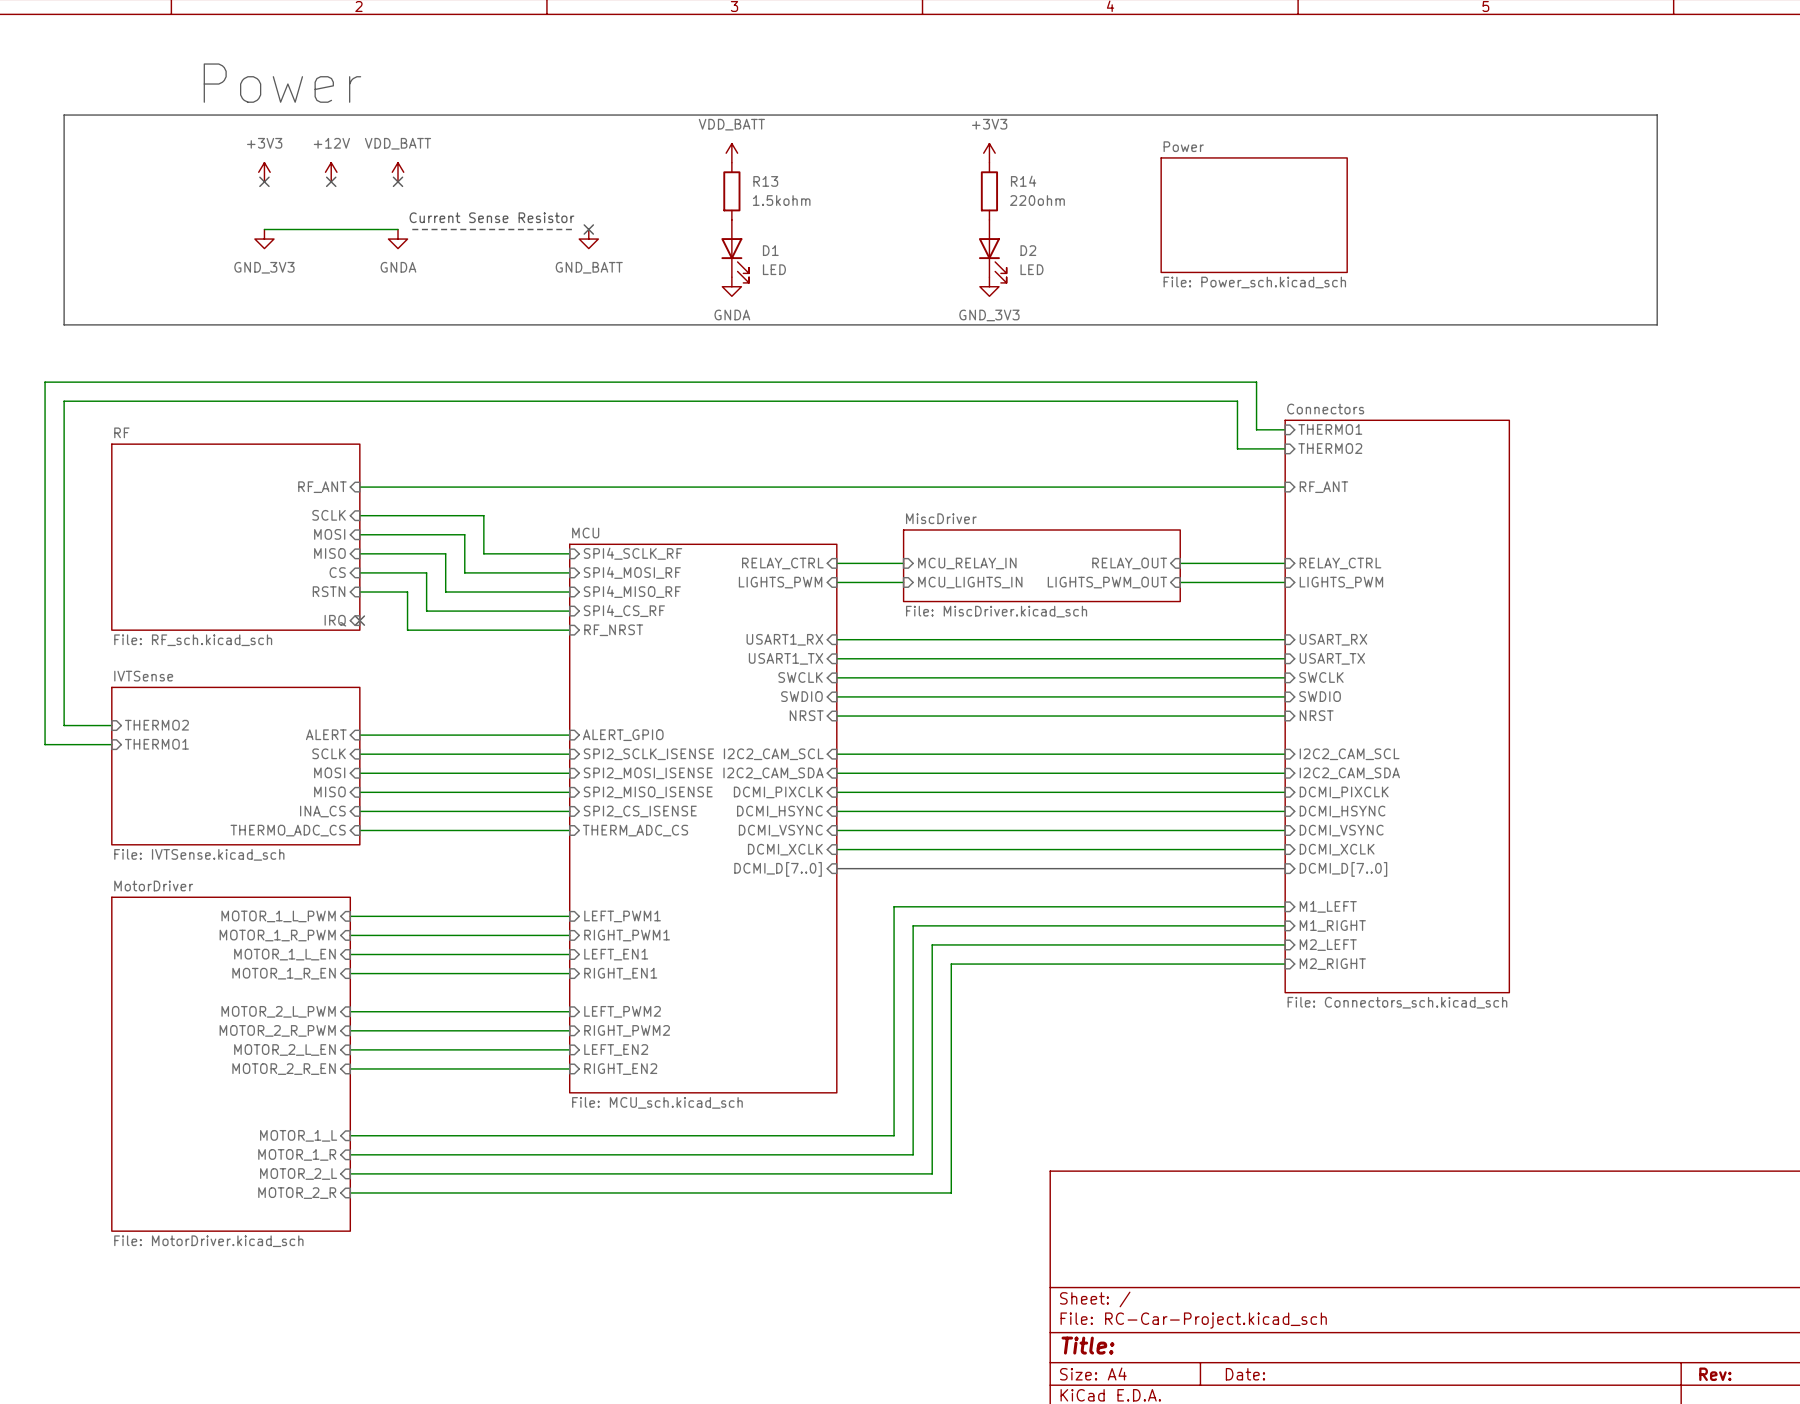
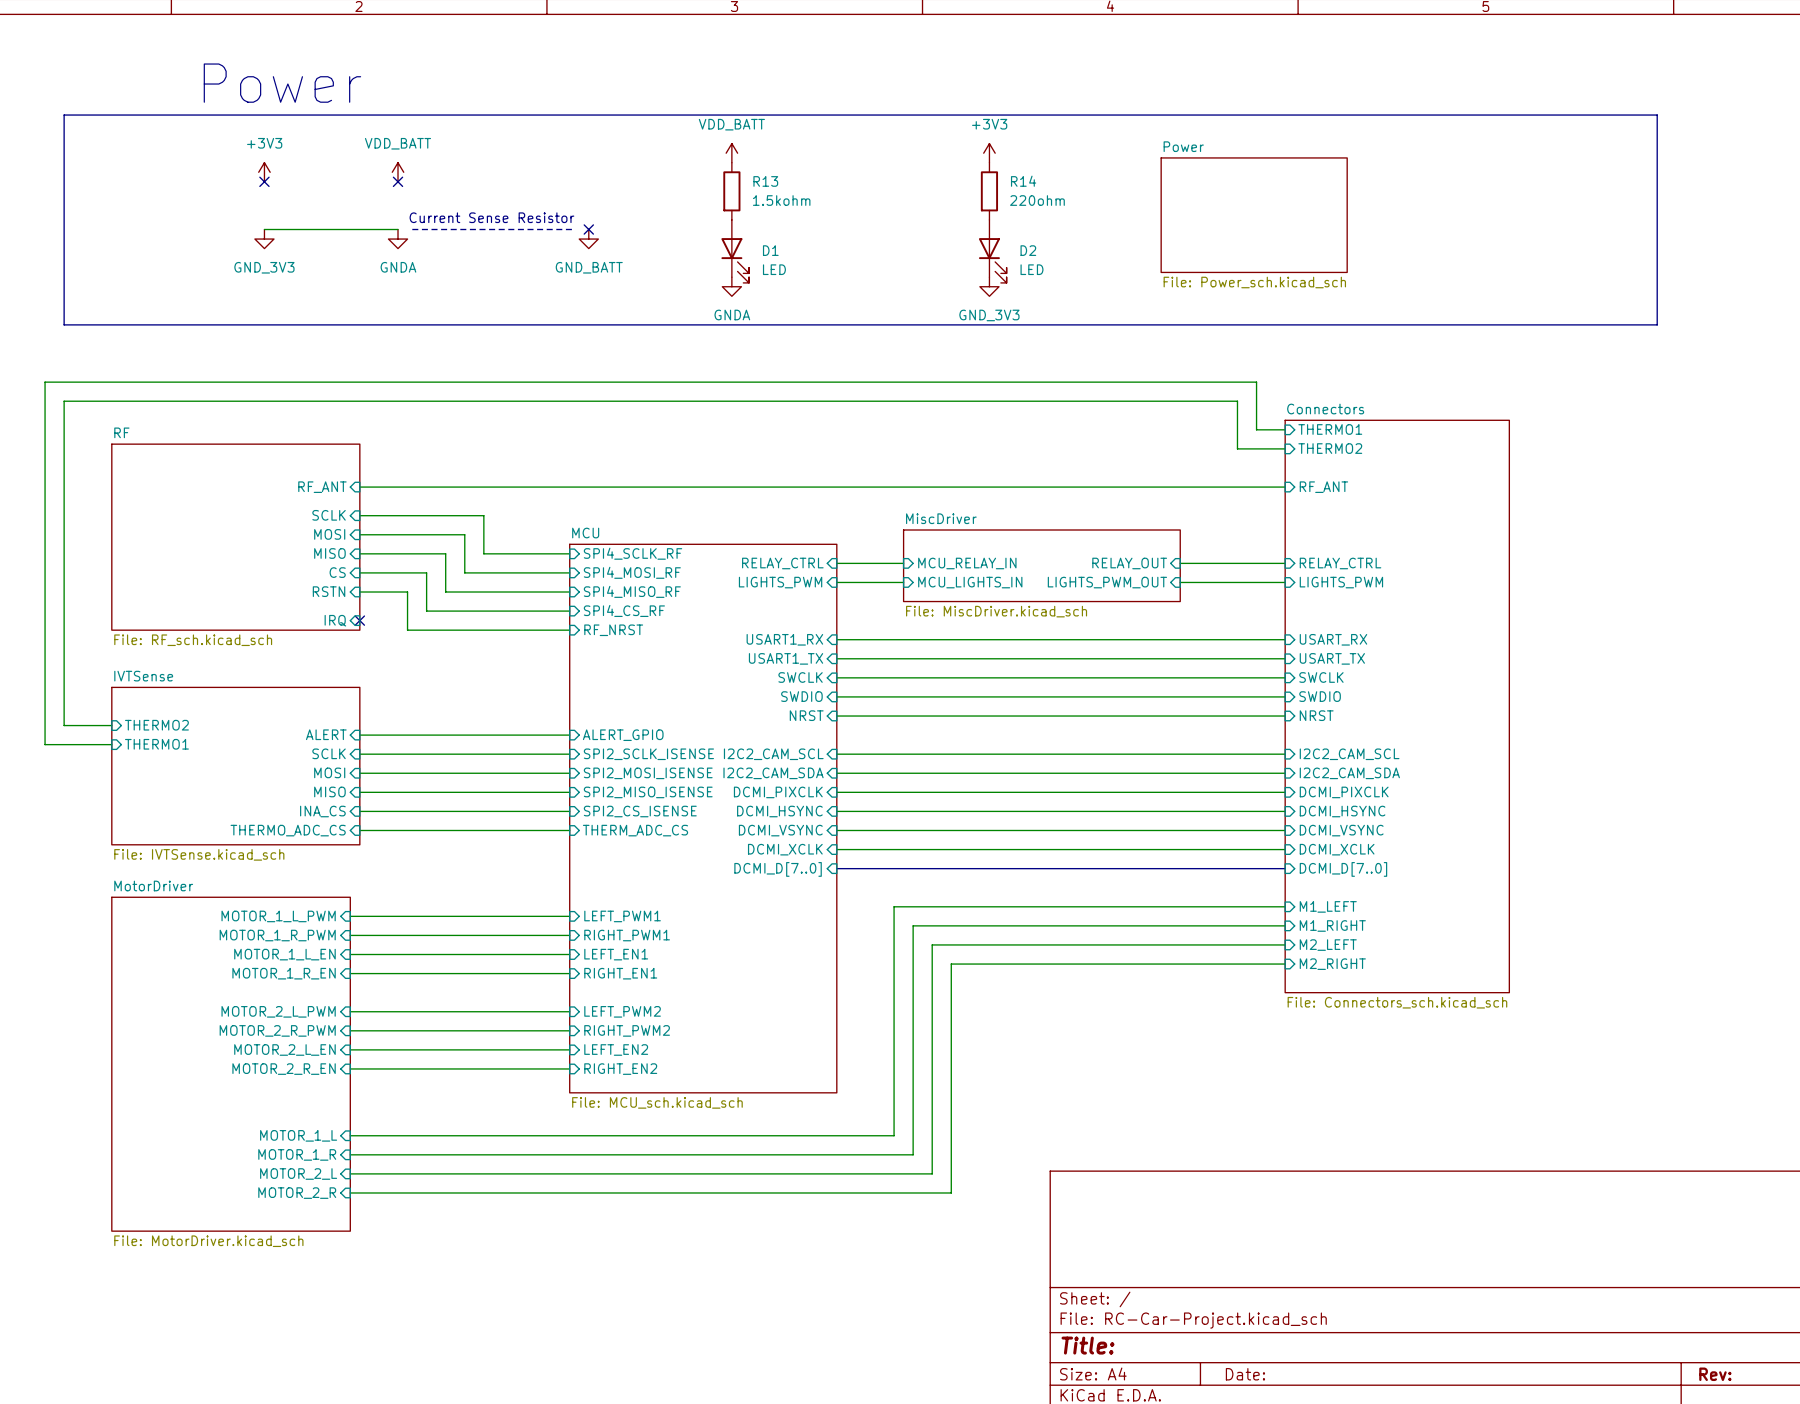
power symbol: +12V (331, 172) -> none
no-connect mark: (331, 181) -> none

